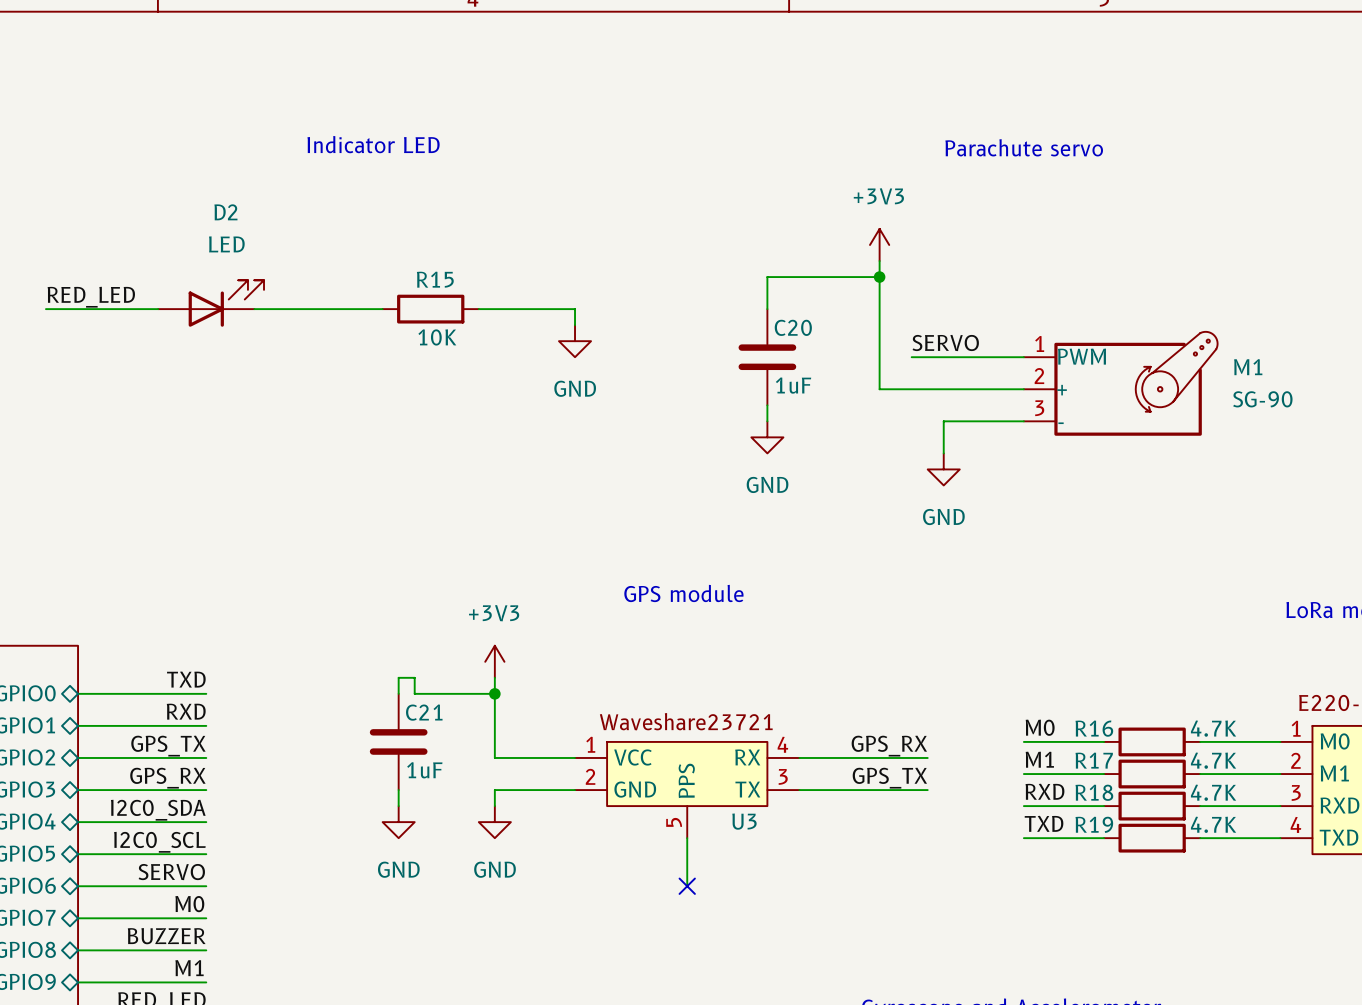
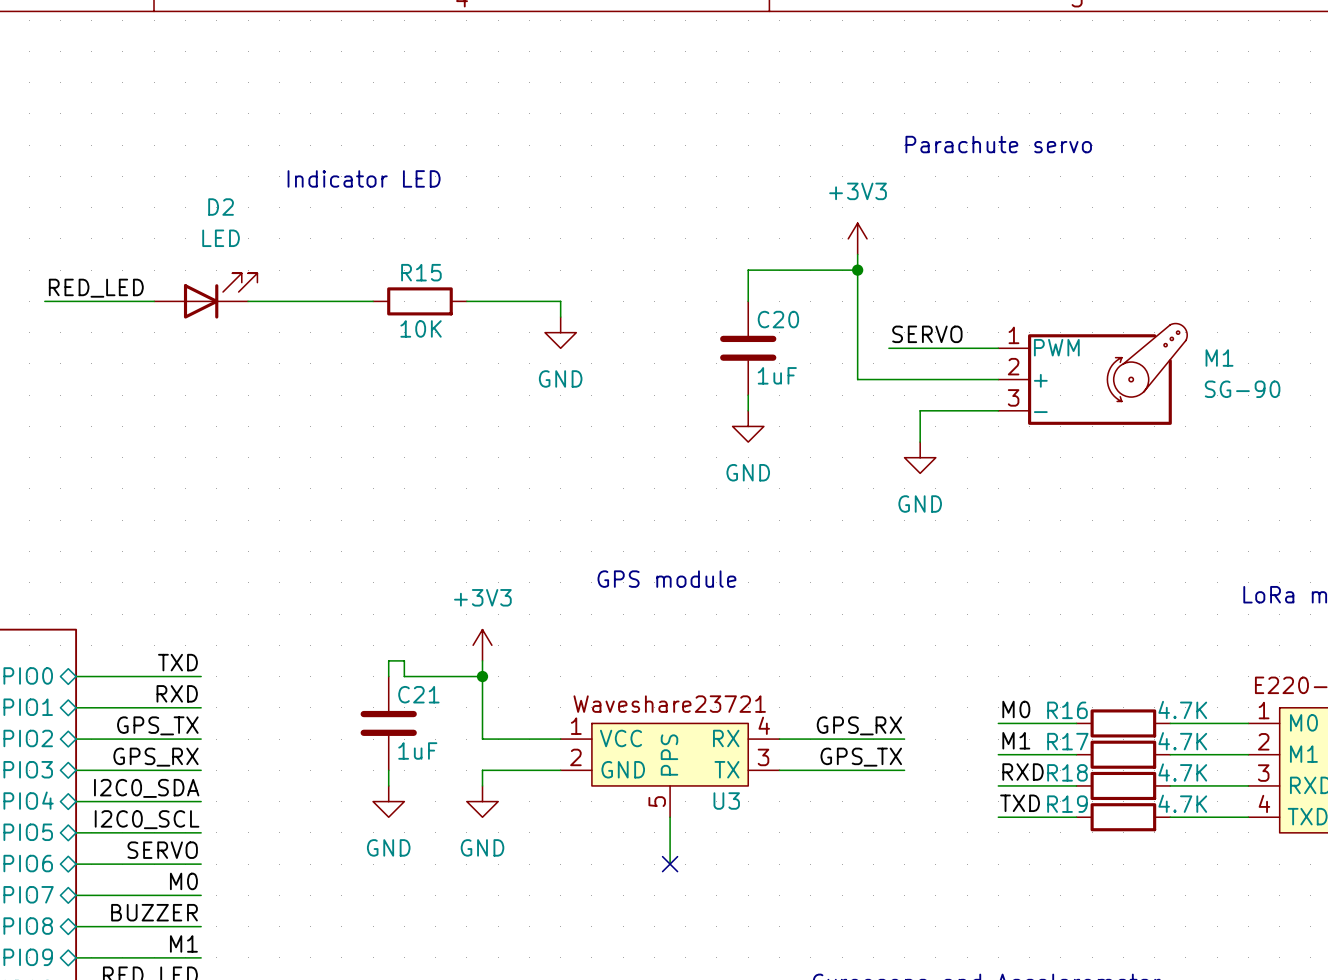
text position: Indicator LED (373, 144) -> Indicator LED (364, 178)

